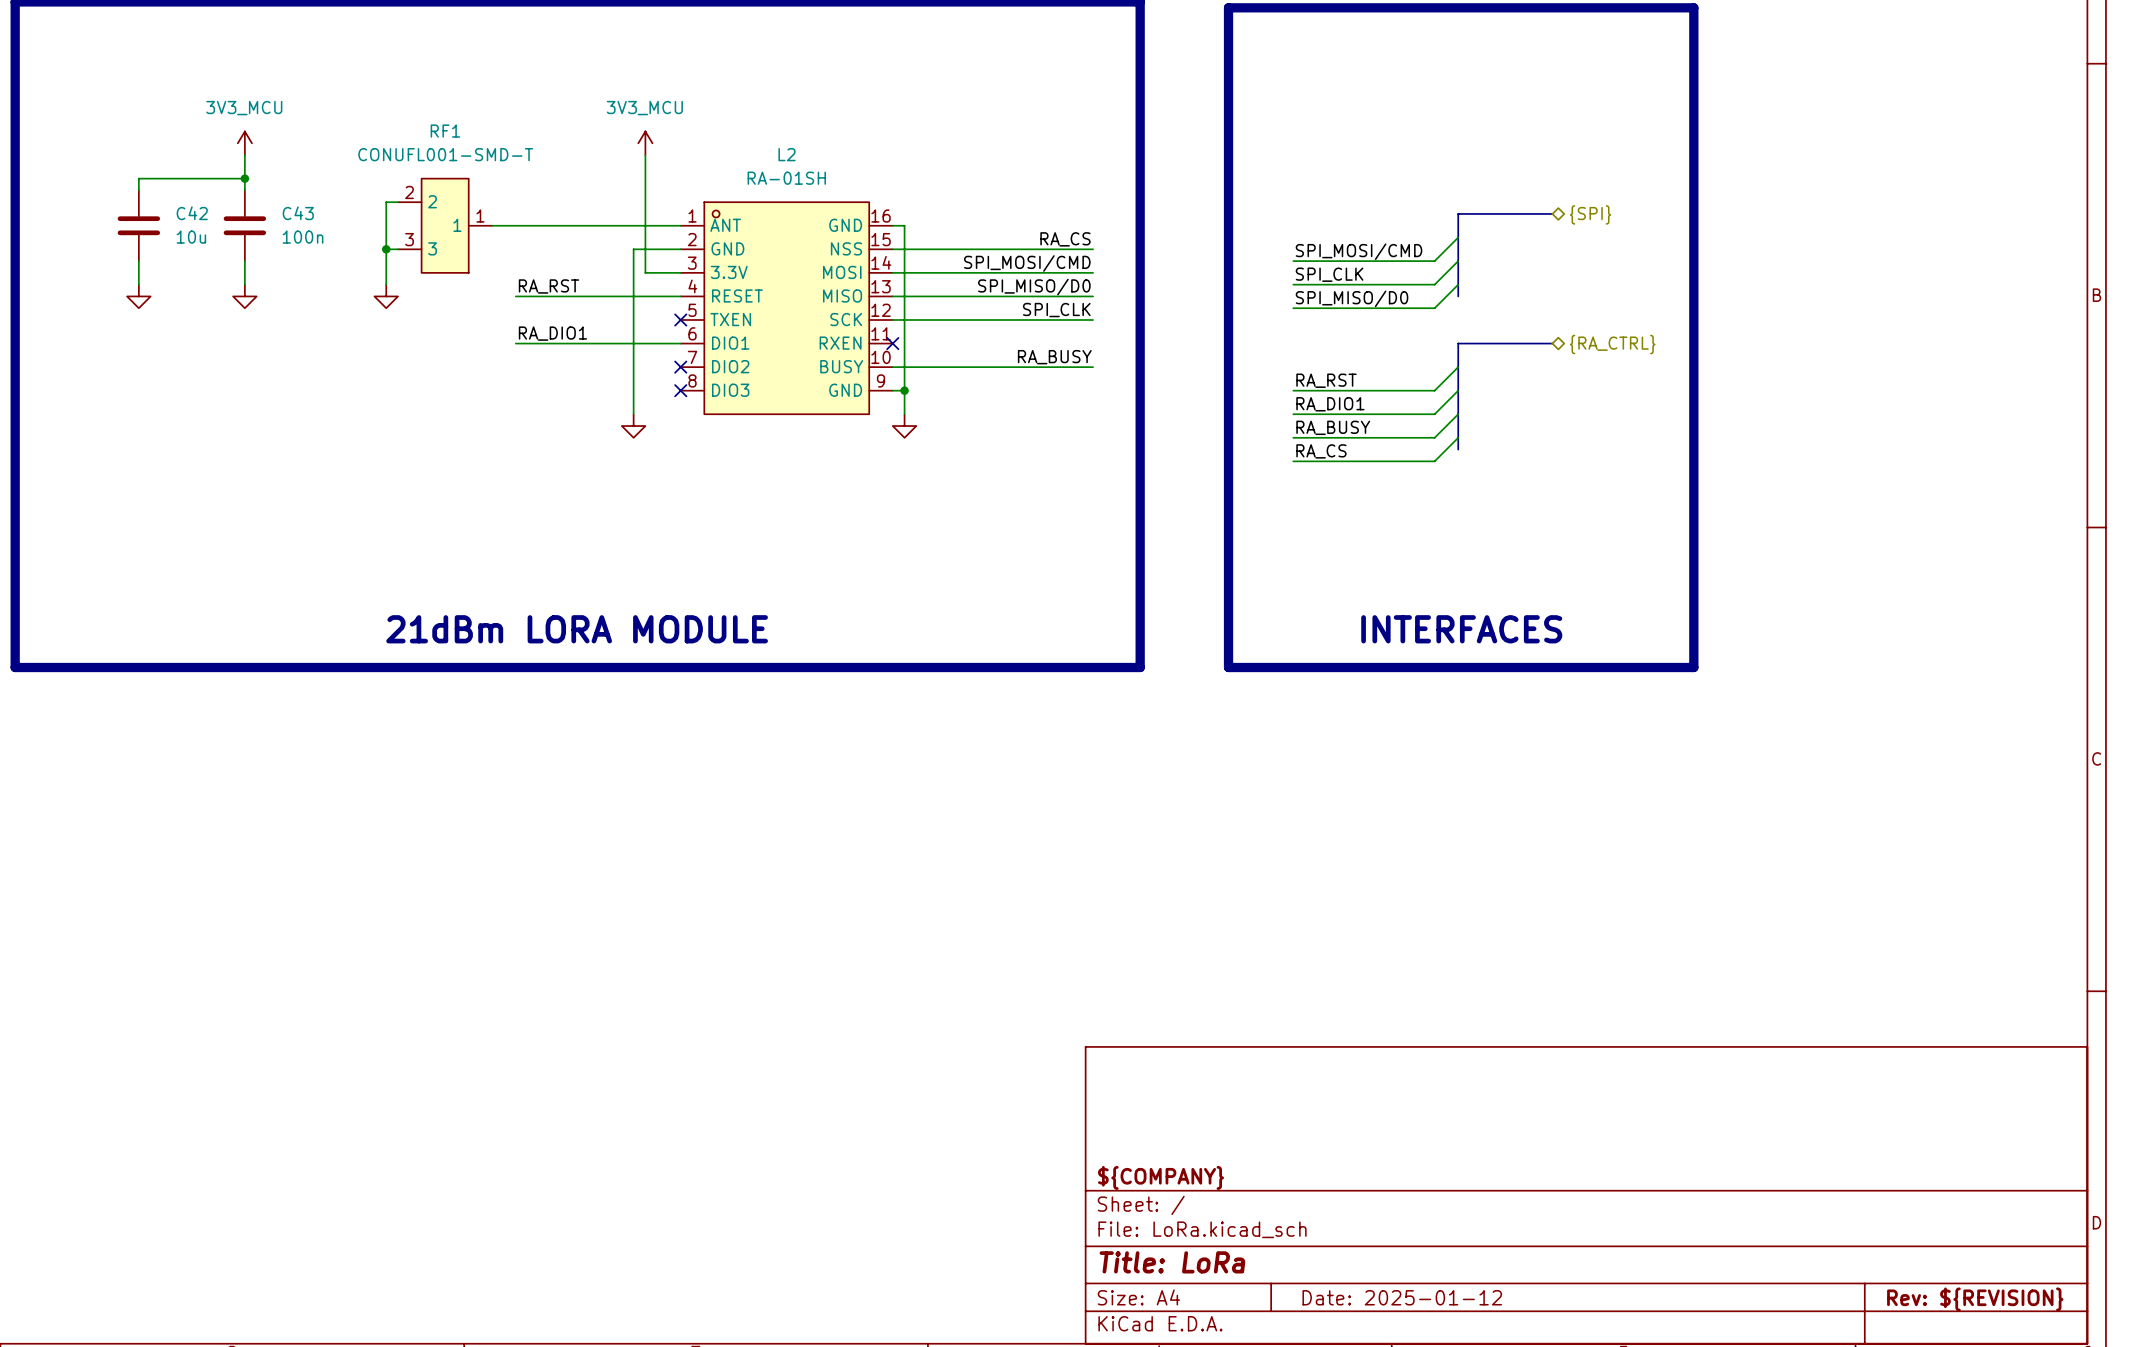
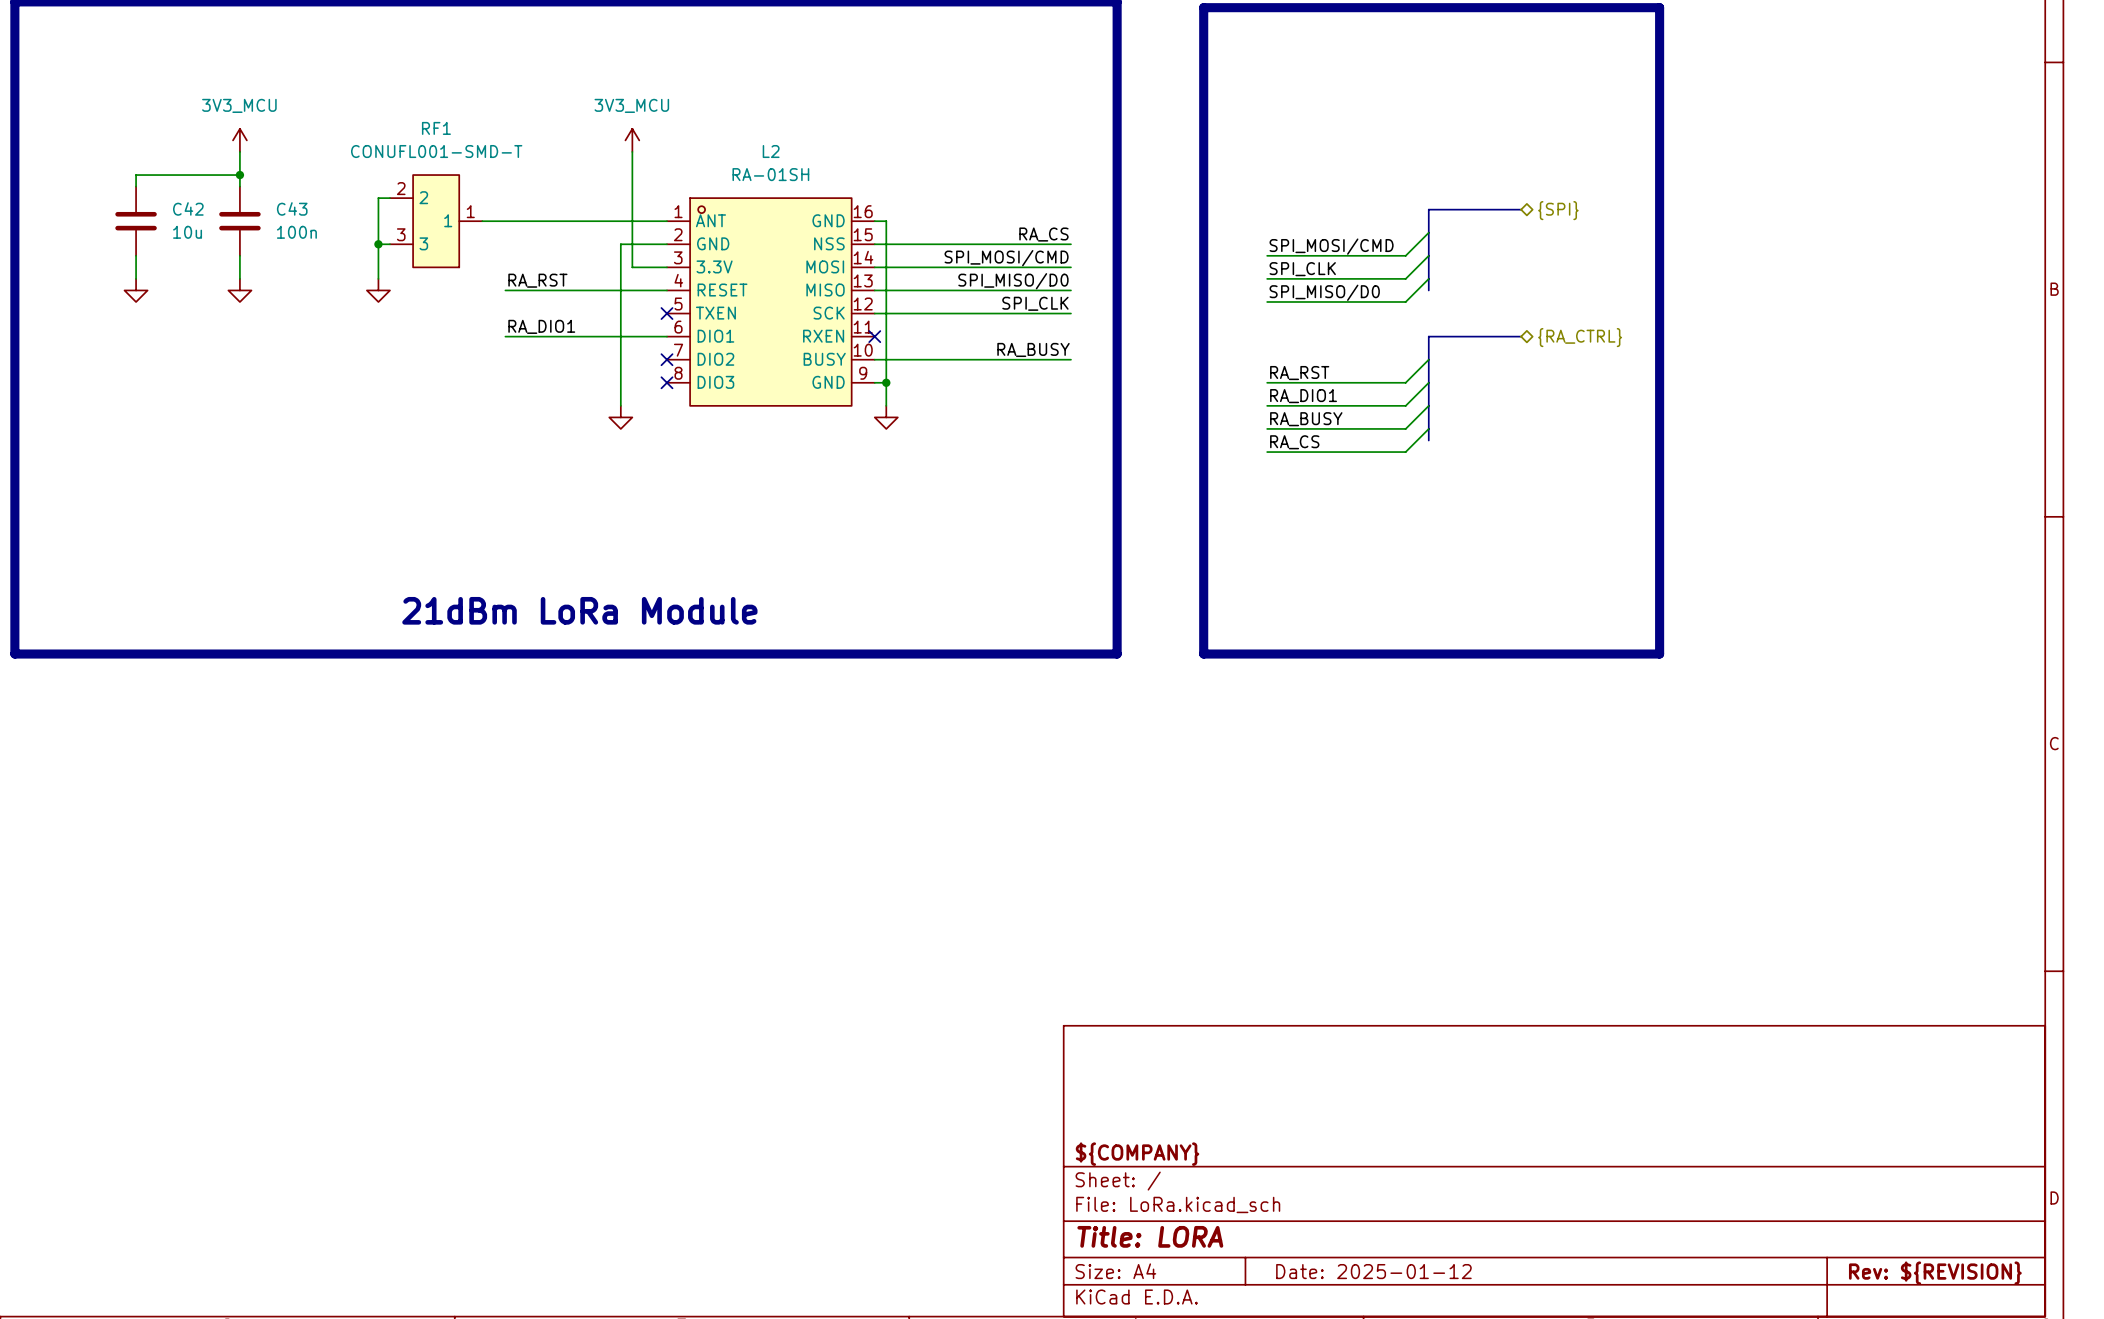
text: none -> 21dBm LoRa Module (579, 610)
text: 21dBm LORA MODULE (577, 629) -> none
text: INTERFACES (1461, 629) -> none
title block: Title: LoRa (1172, 1262) -> Title: LORA (1150, 1236)

